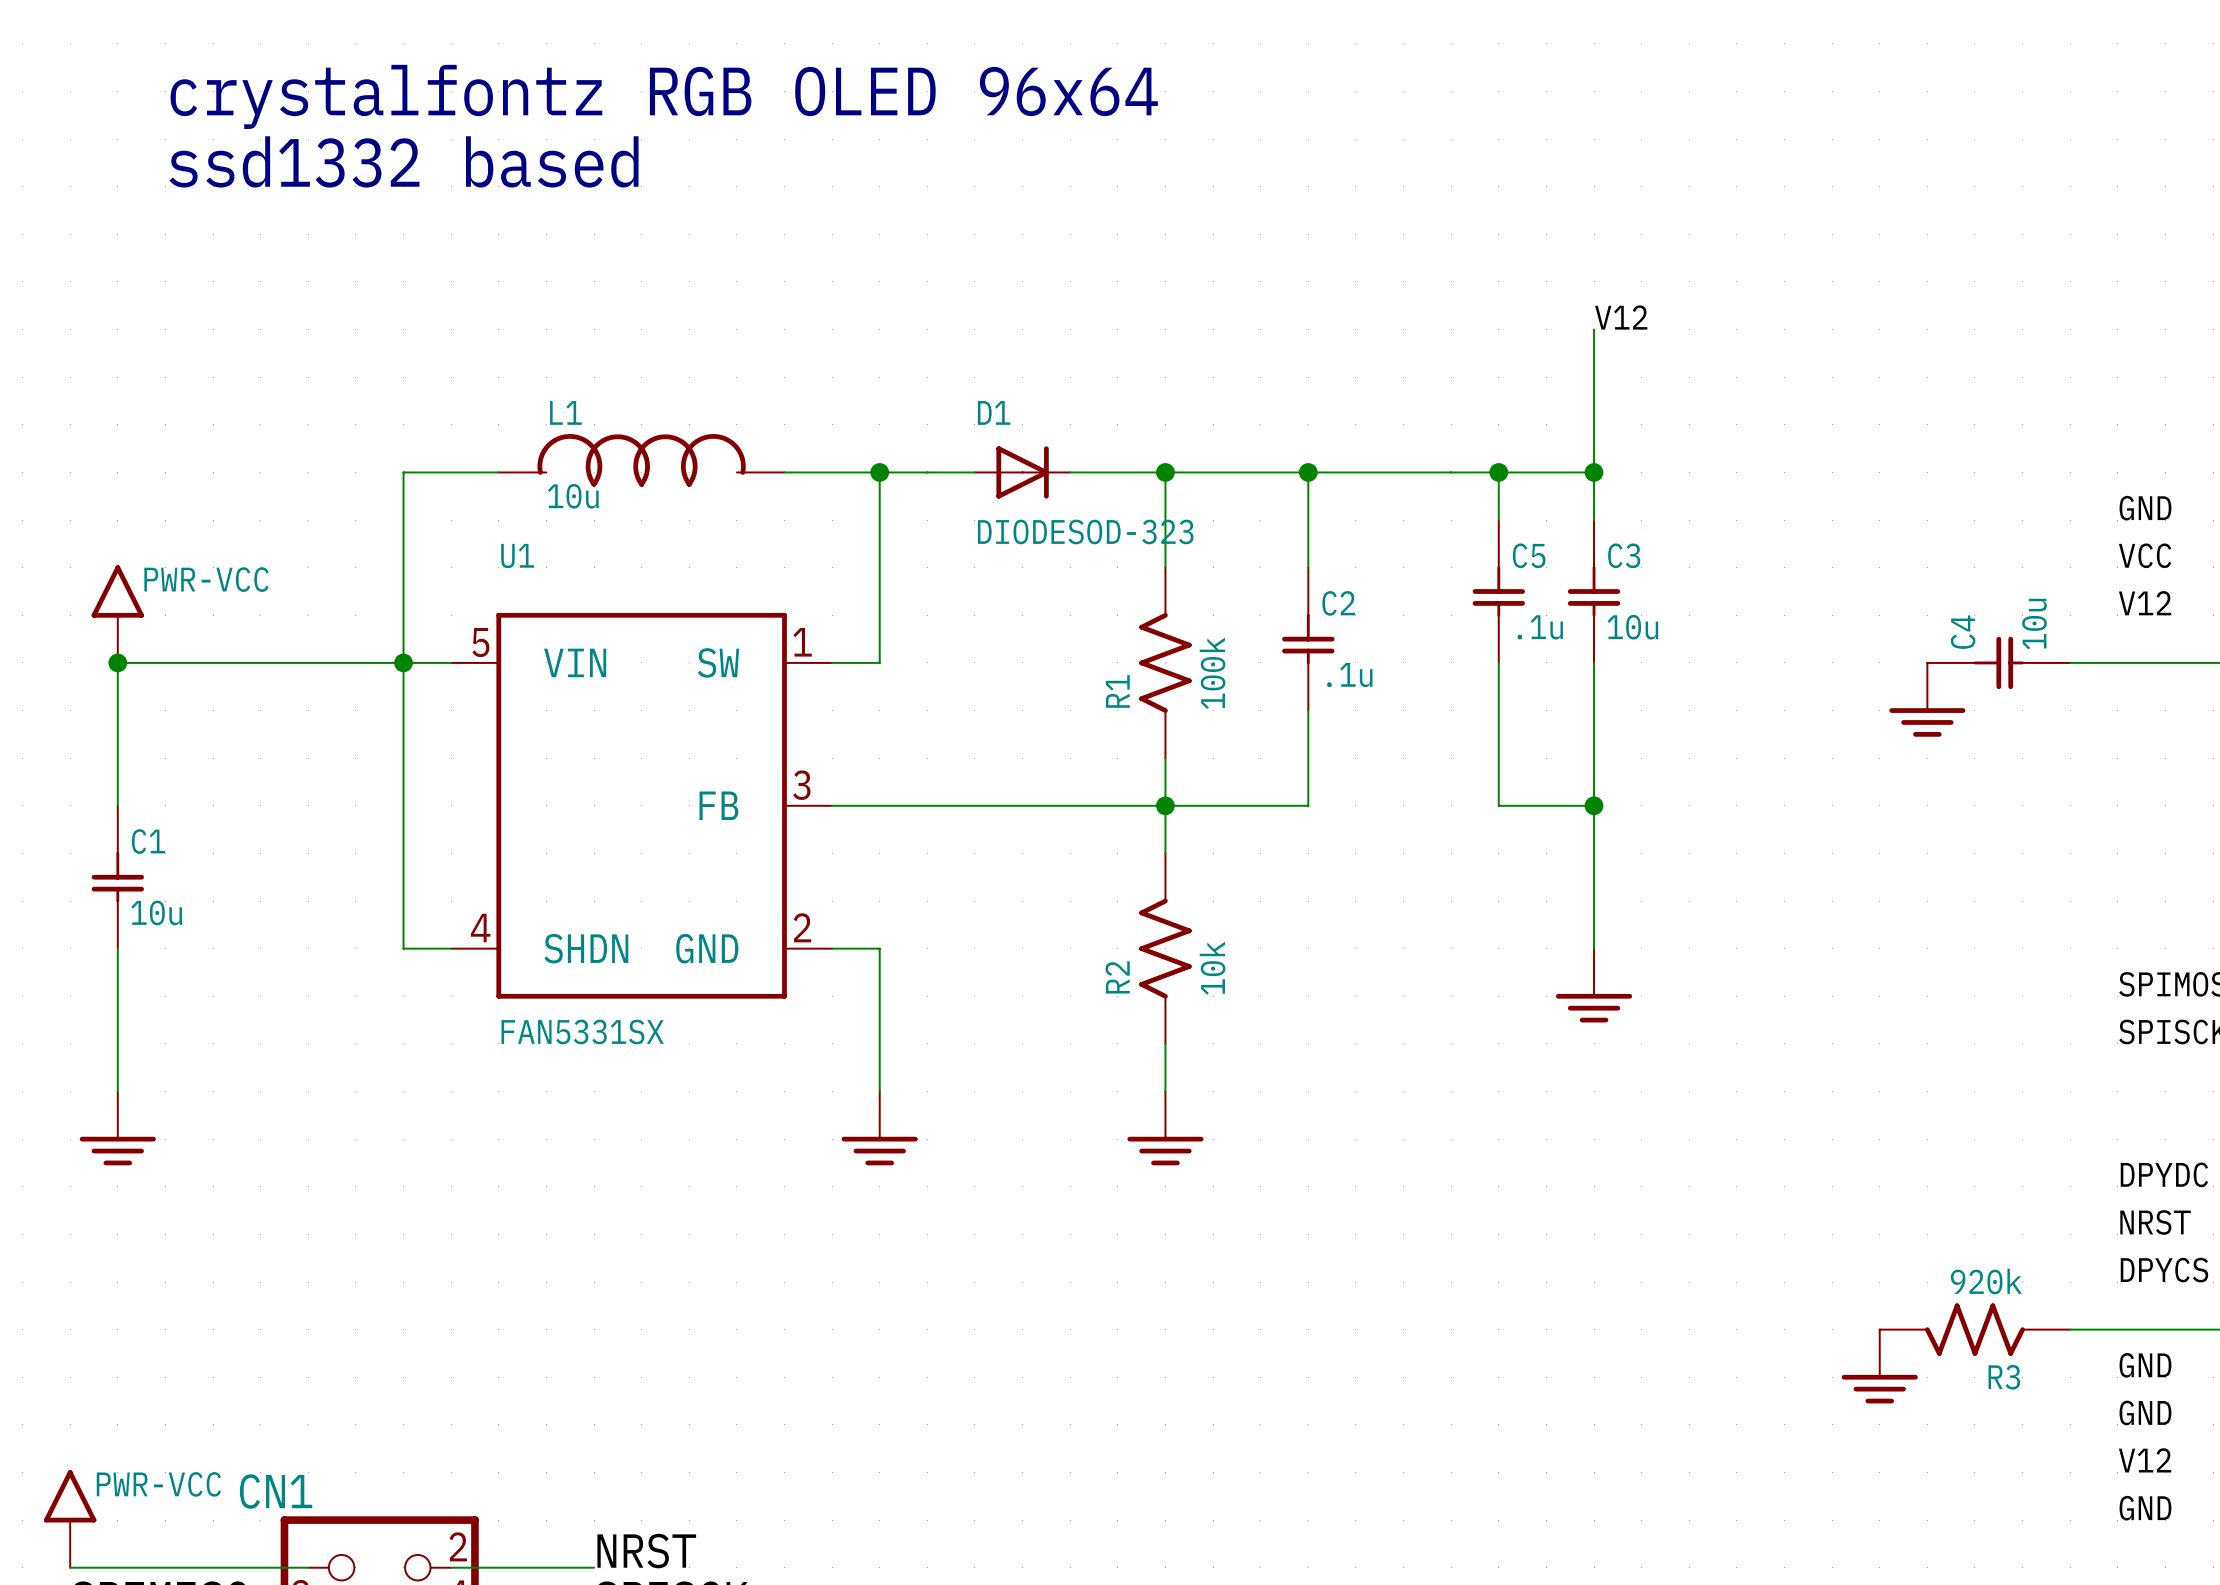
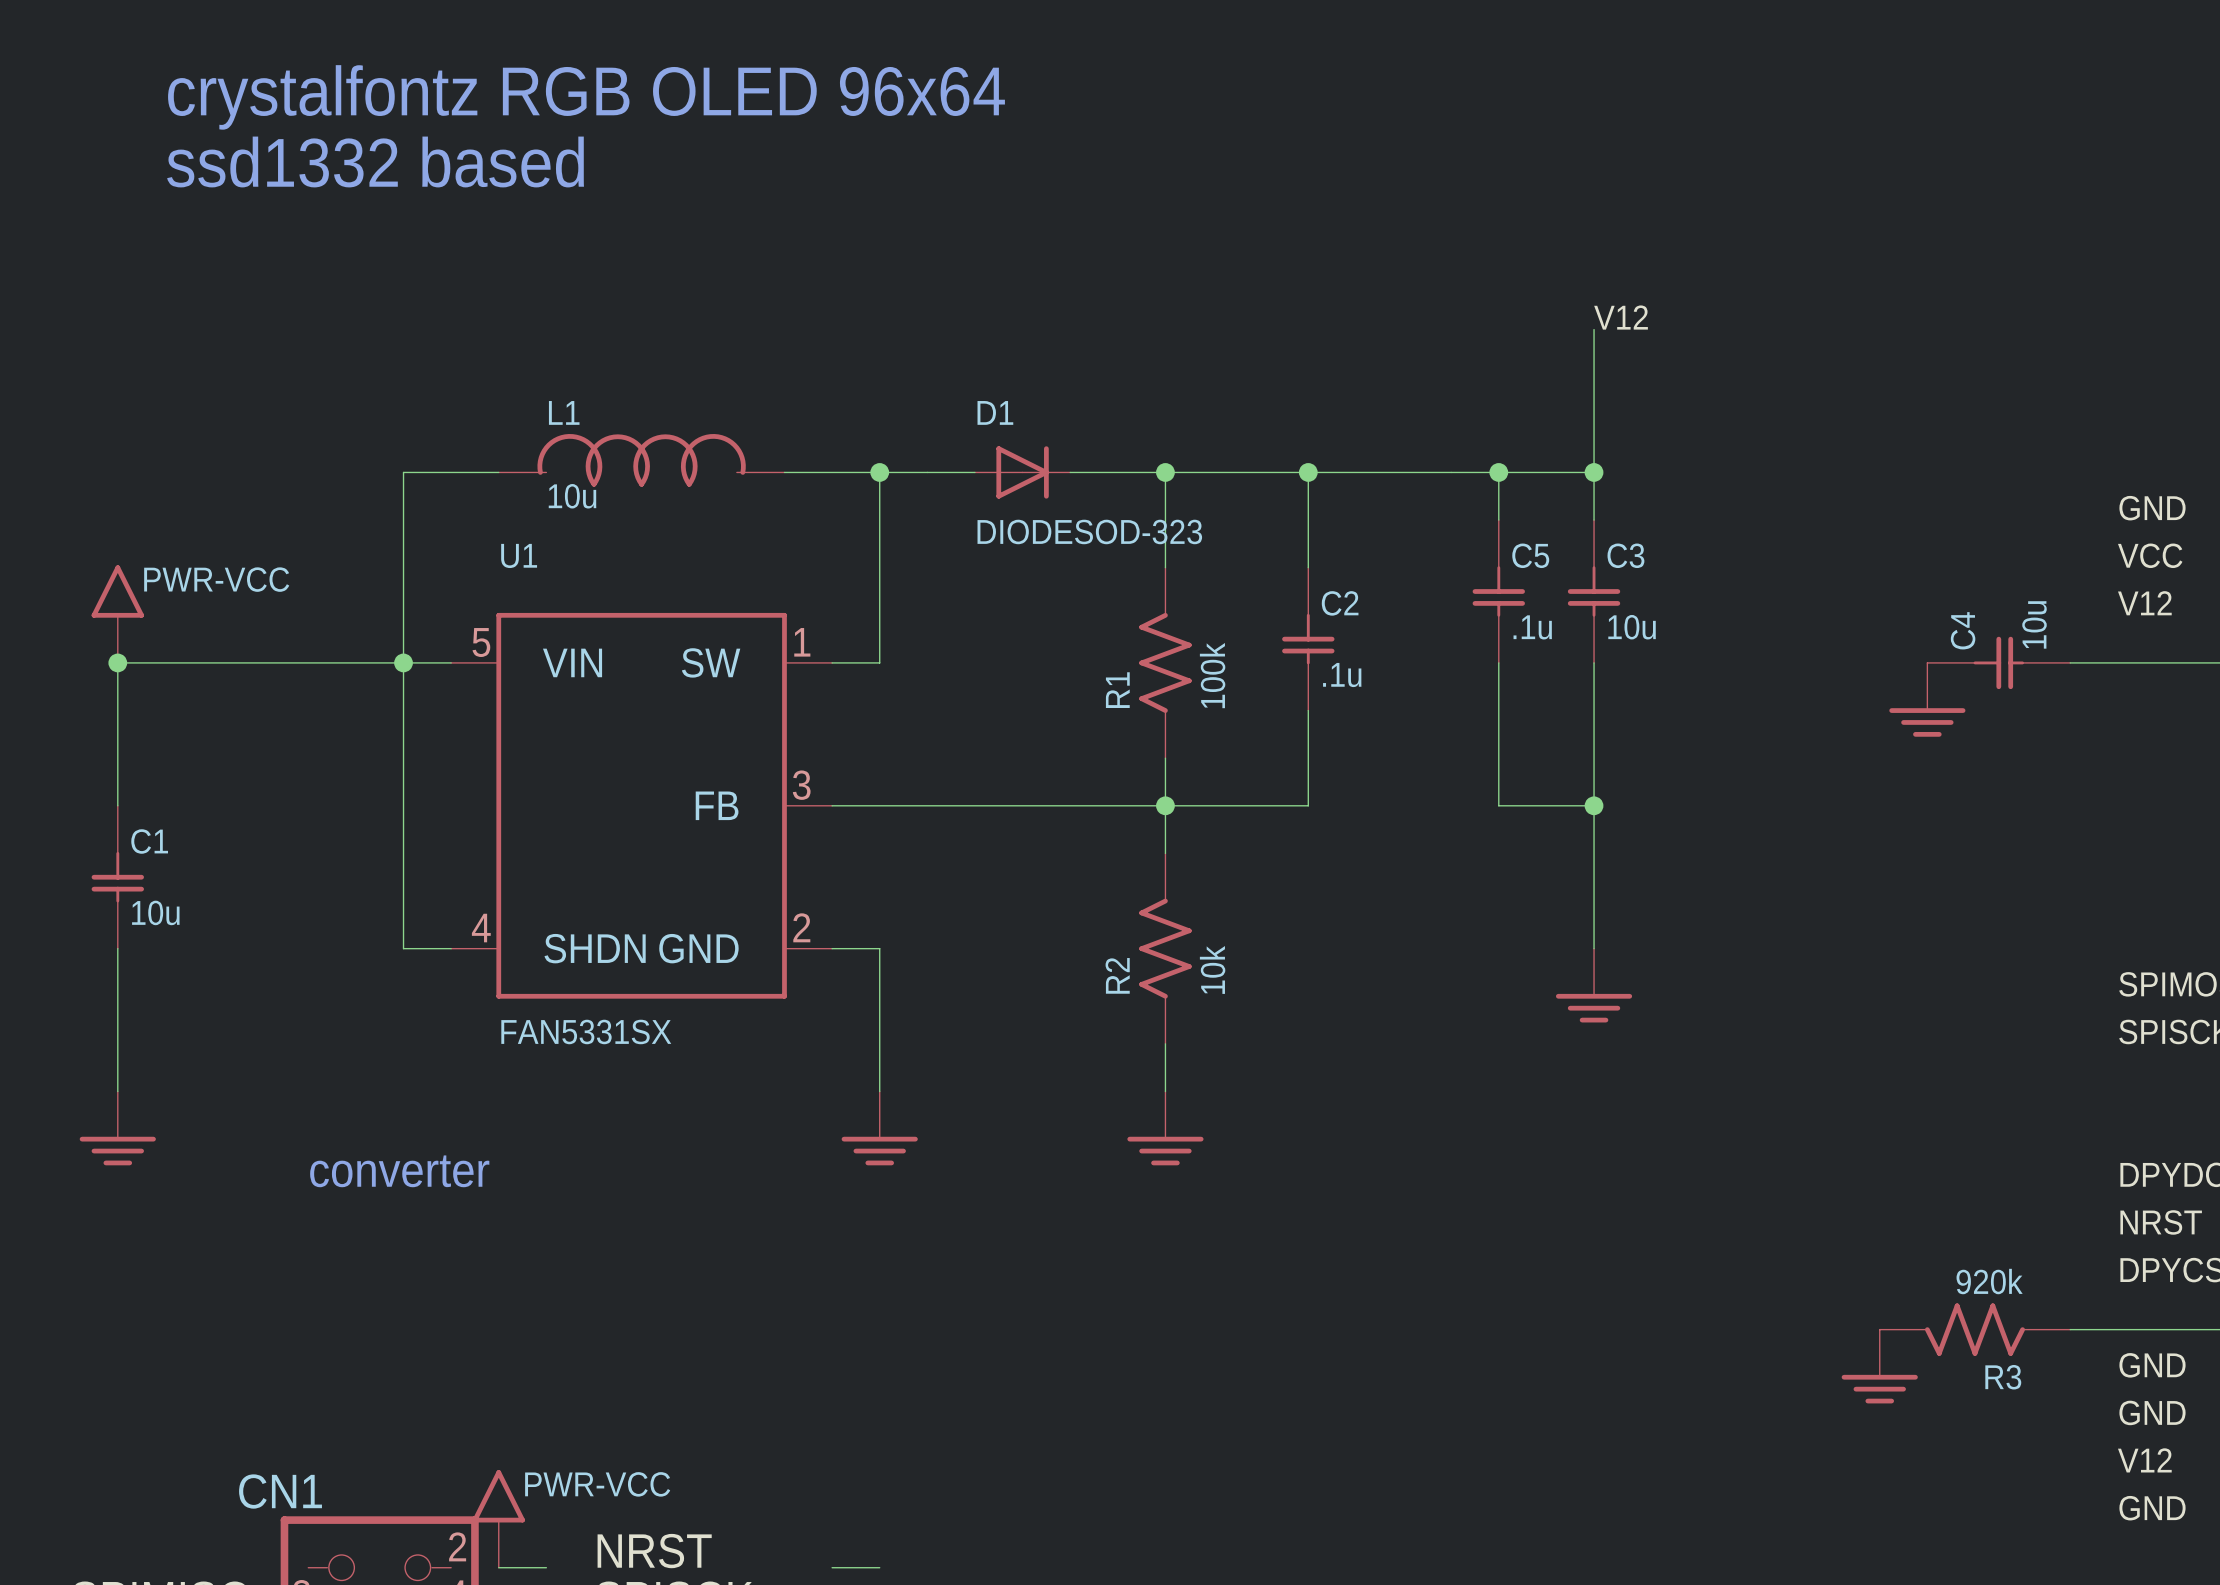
text: none -> converter (399, 1171)
power symbol position: PWR-VCC (70, 1518) -> PWR-VCC (498, 1518)
wire: (70, 1567) (308, 1567) -> none
wire: (451, 1567) (498, 1567) -> none
wire: (546, 1567) (594, 1567) -> (832, 1567) (879, 1567)

